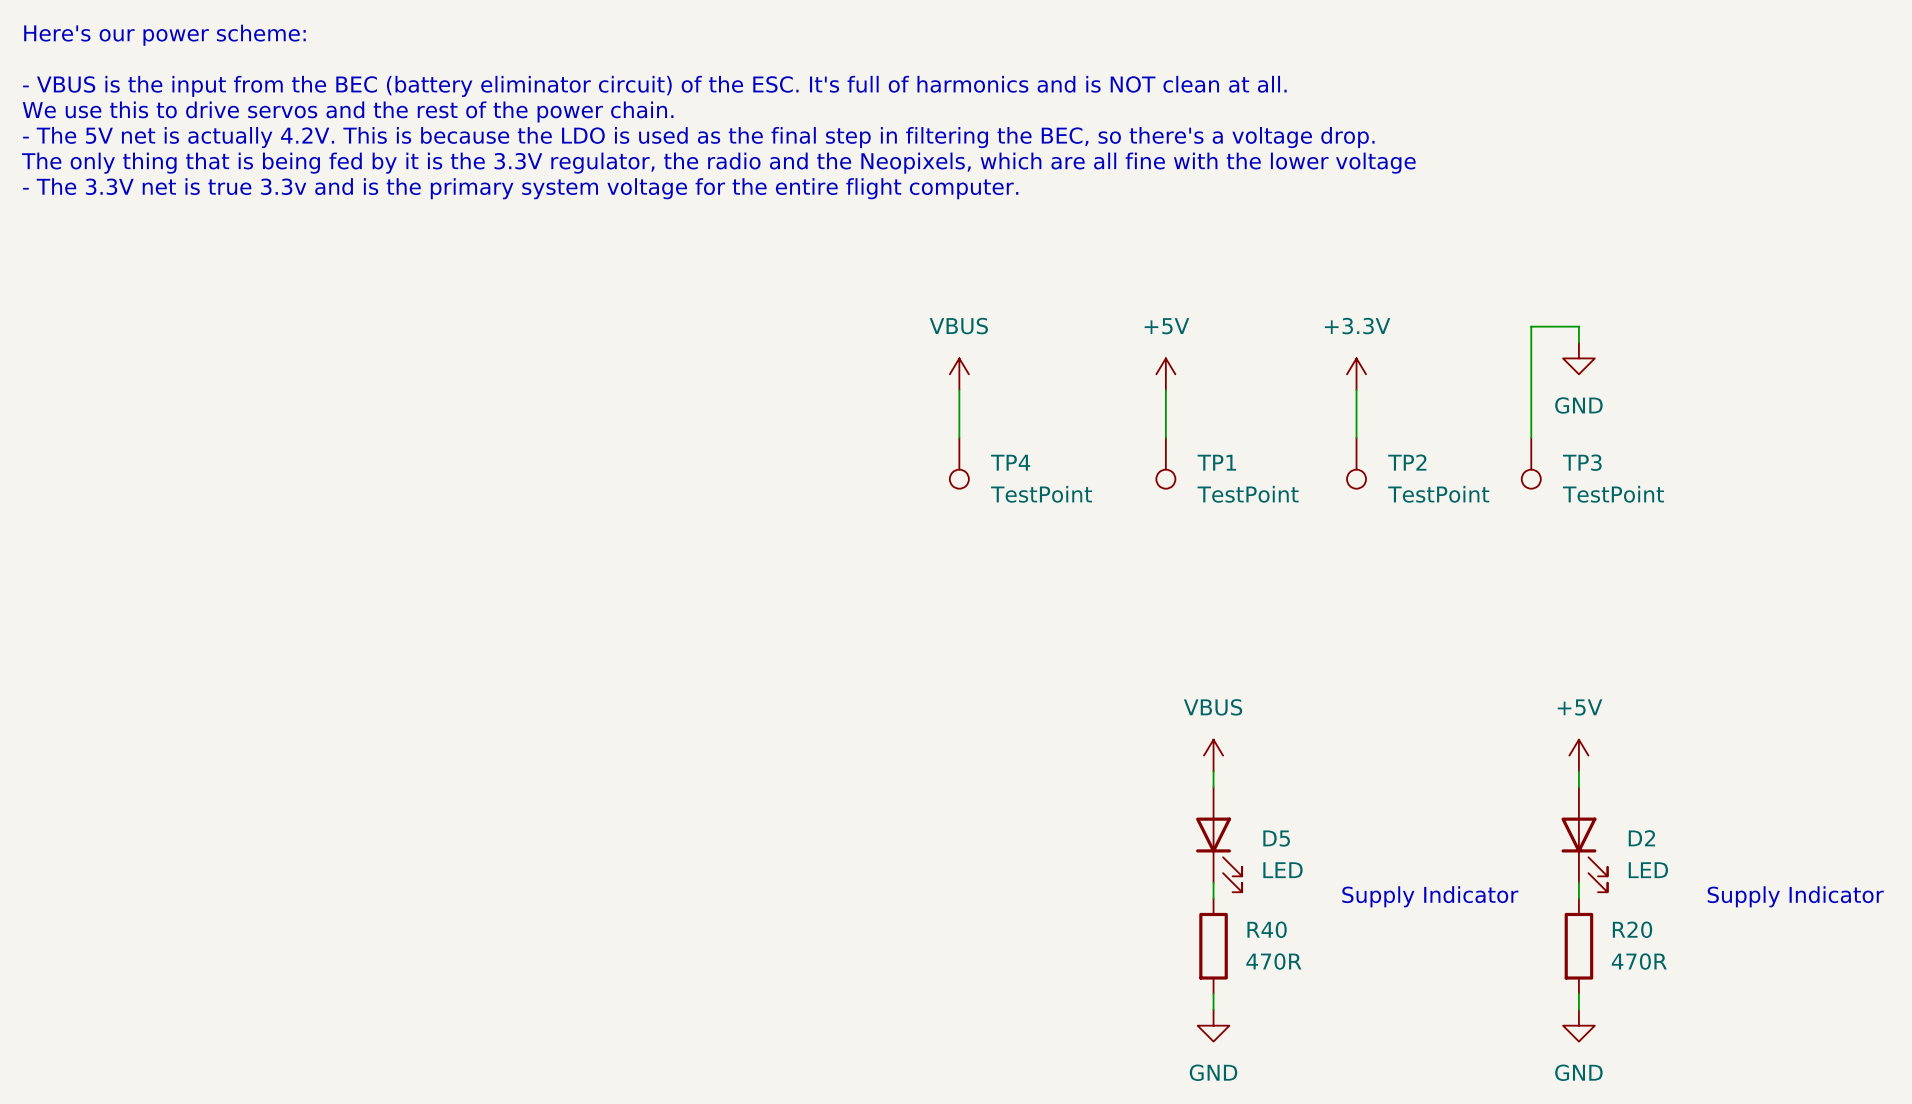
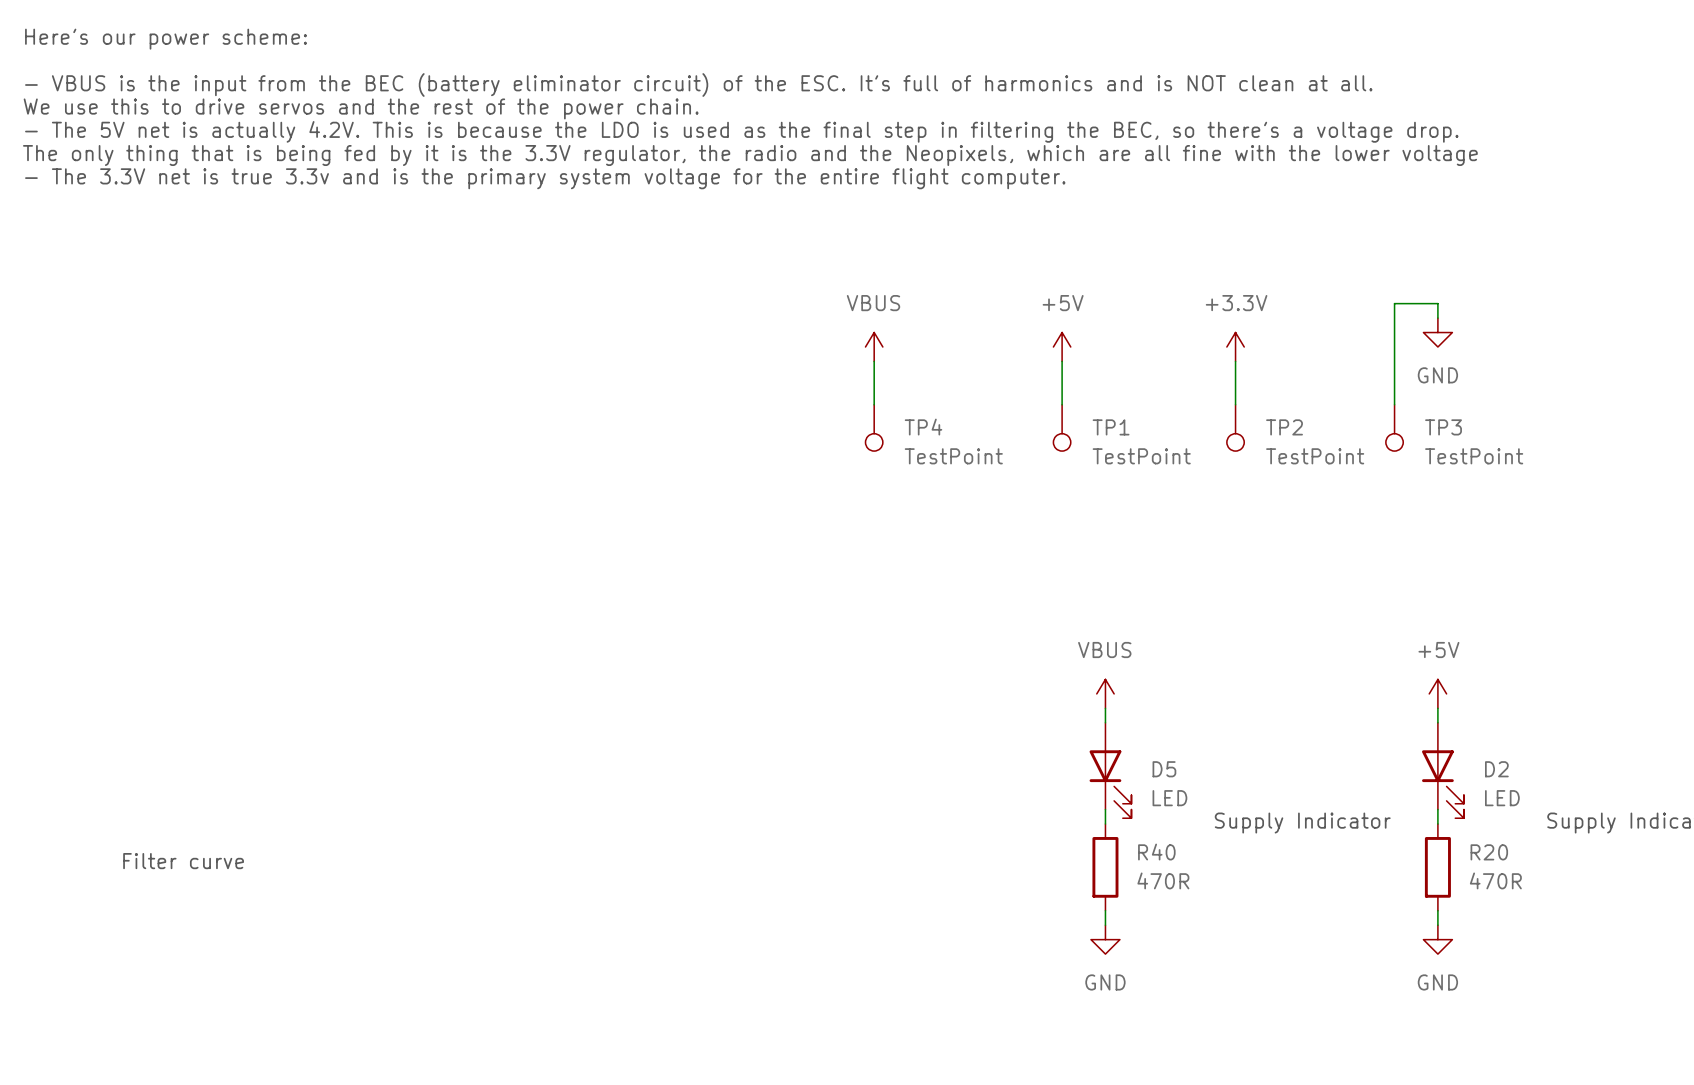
text: none -> Filter curve (183, 861)

